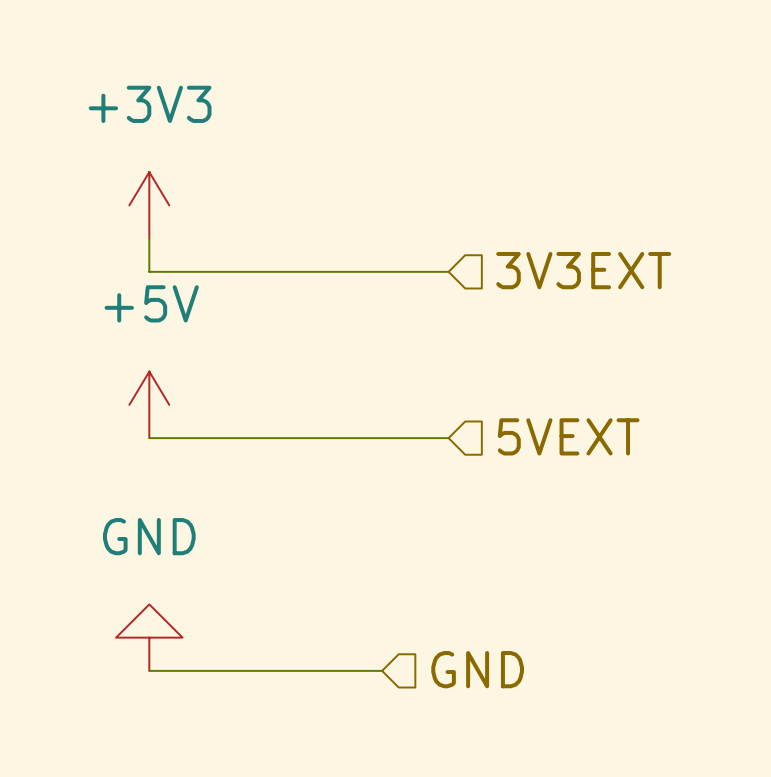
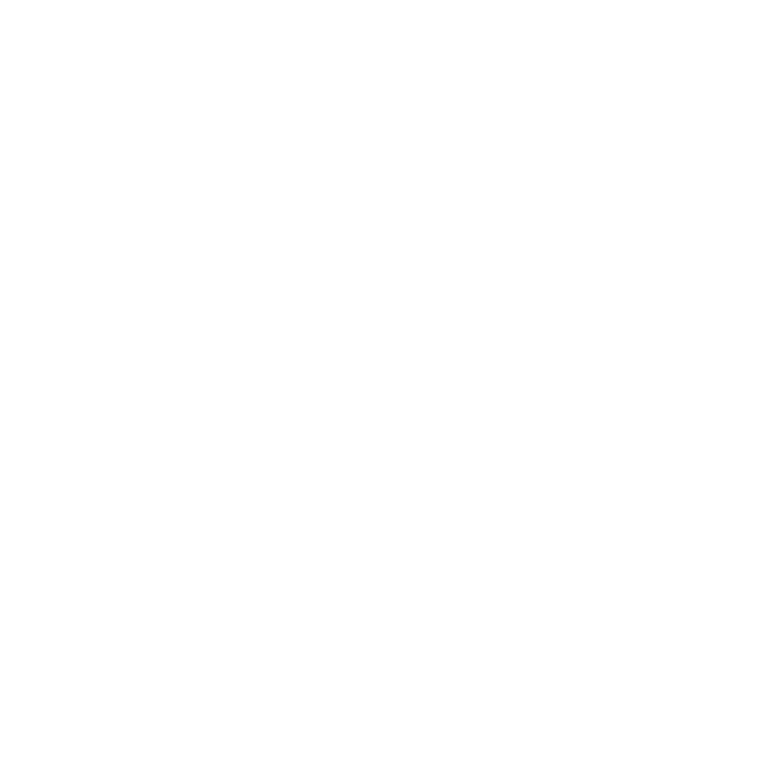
power symbol: +3V3 (149, 205) -> none
wire: (149, 238) (149, 271) (448, 271) -> none
hierarchical label: 3V3EXT (583, 270) -> none
power symbol: +5V (149, 404) -> none
hierarchical label: 5VEXT (568, 436) -> none
wire: (149, 438) (448, 438) -> none
power symbol: GND (149, 637) -> none
hierarchical label: GND (477, 669) -> none
wire: (149, 670) (382, 670) -> none

